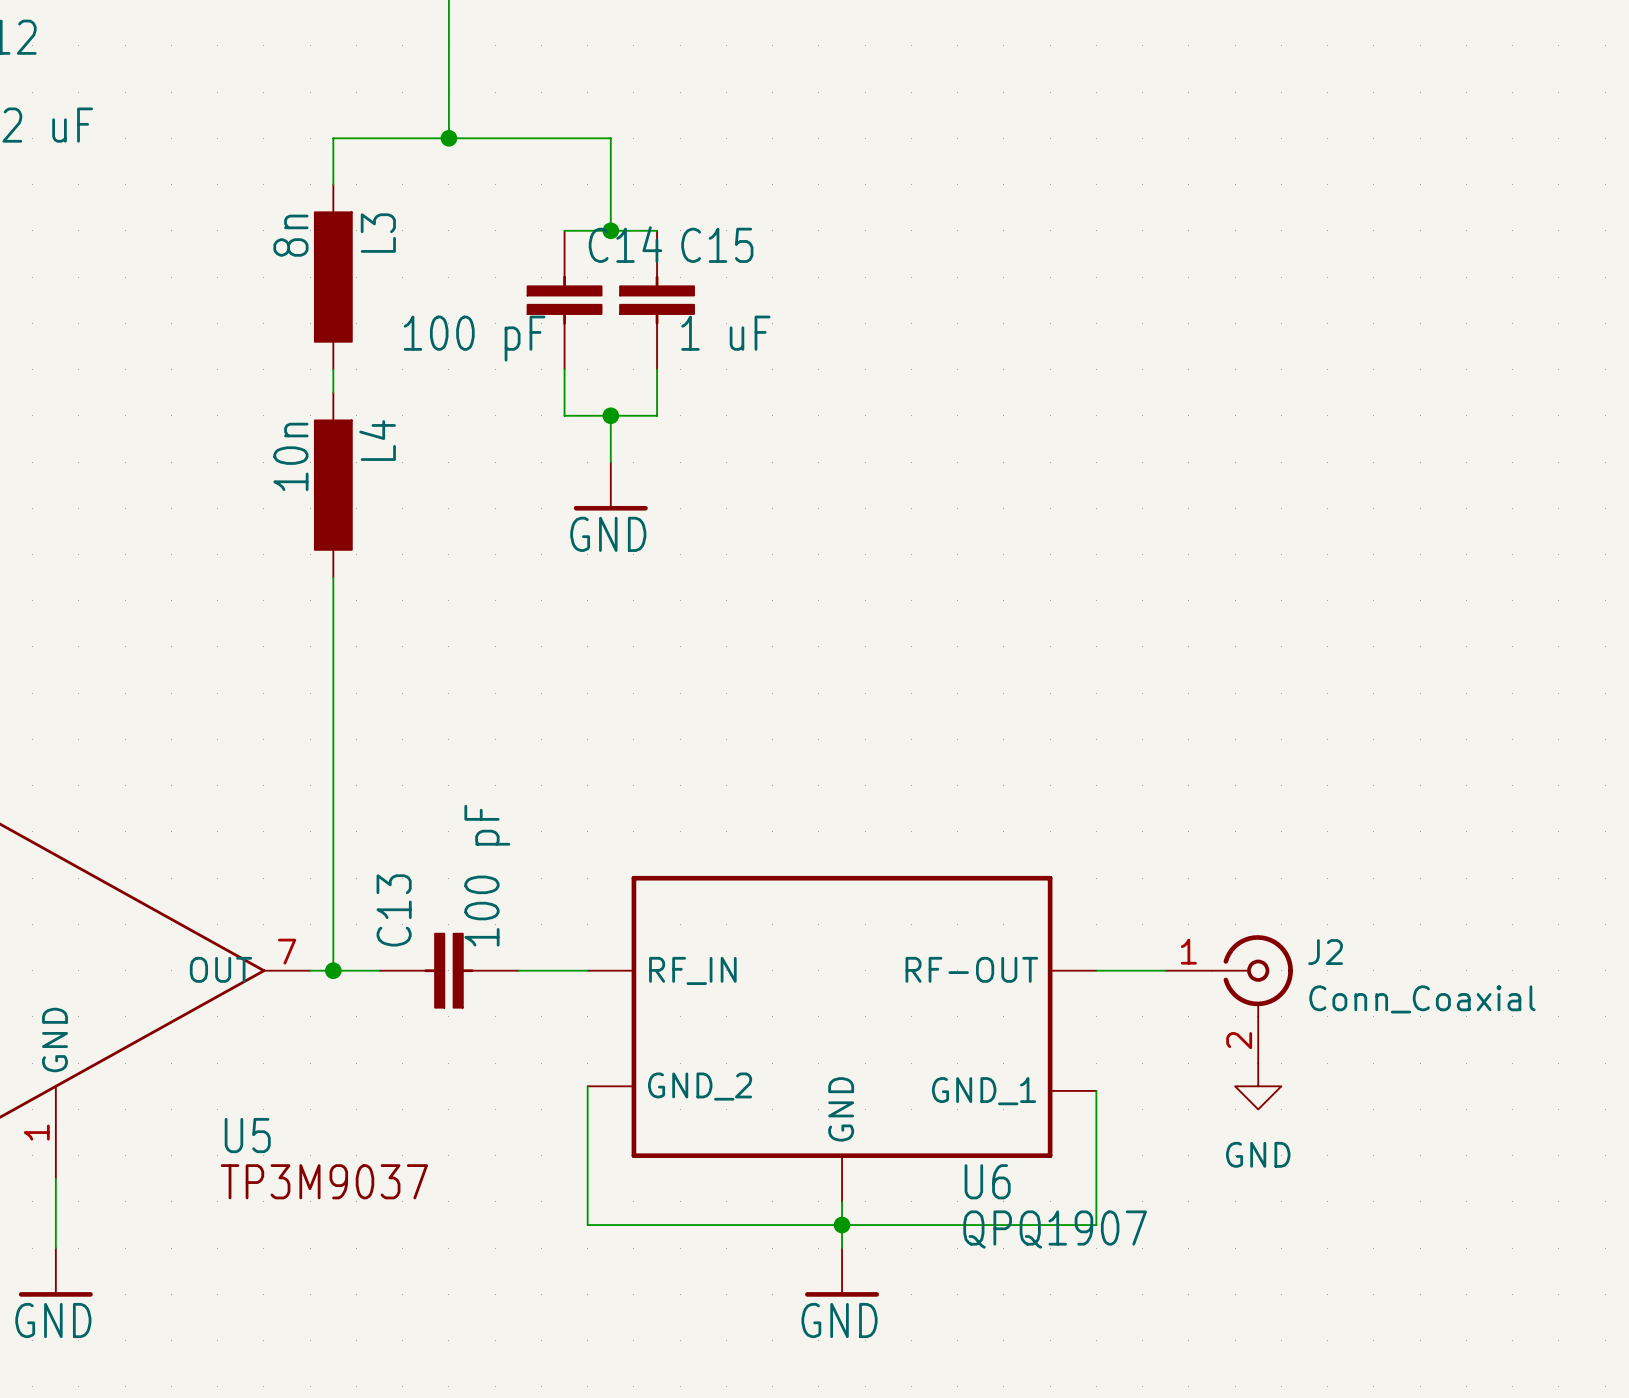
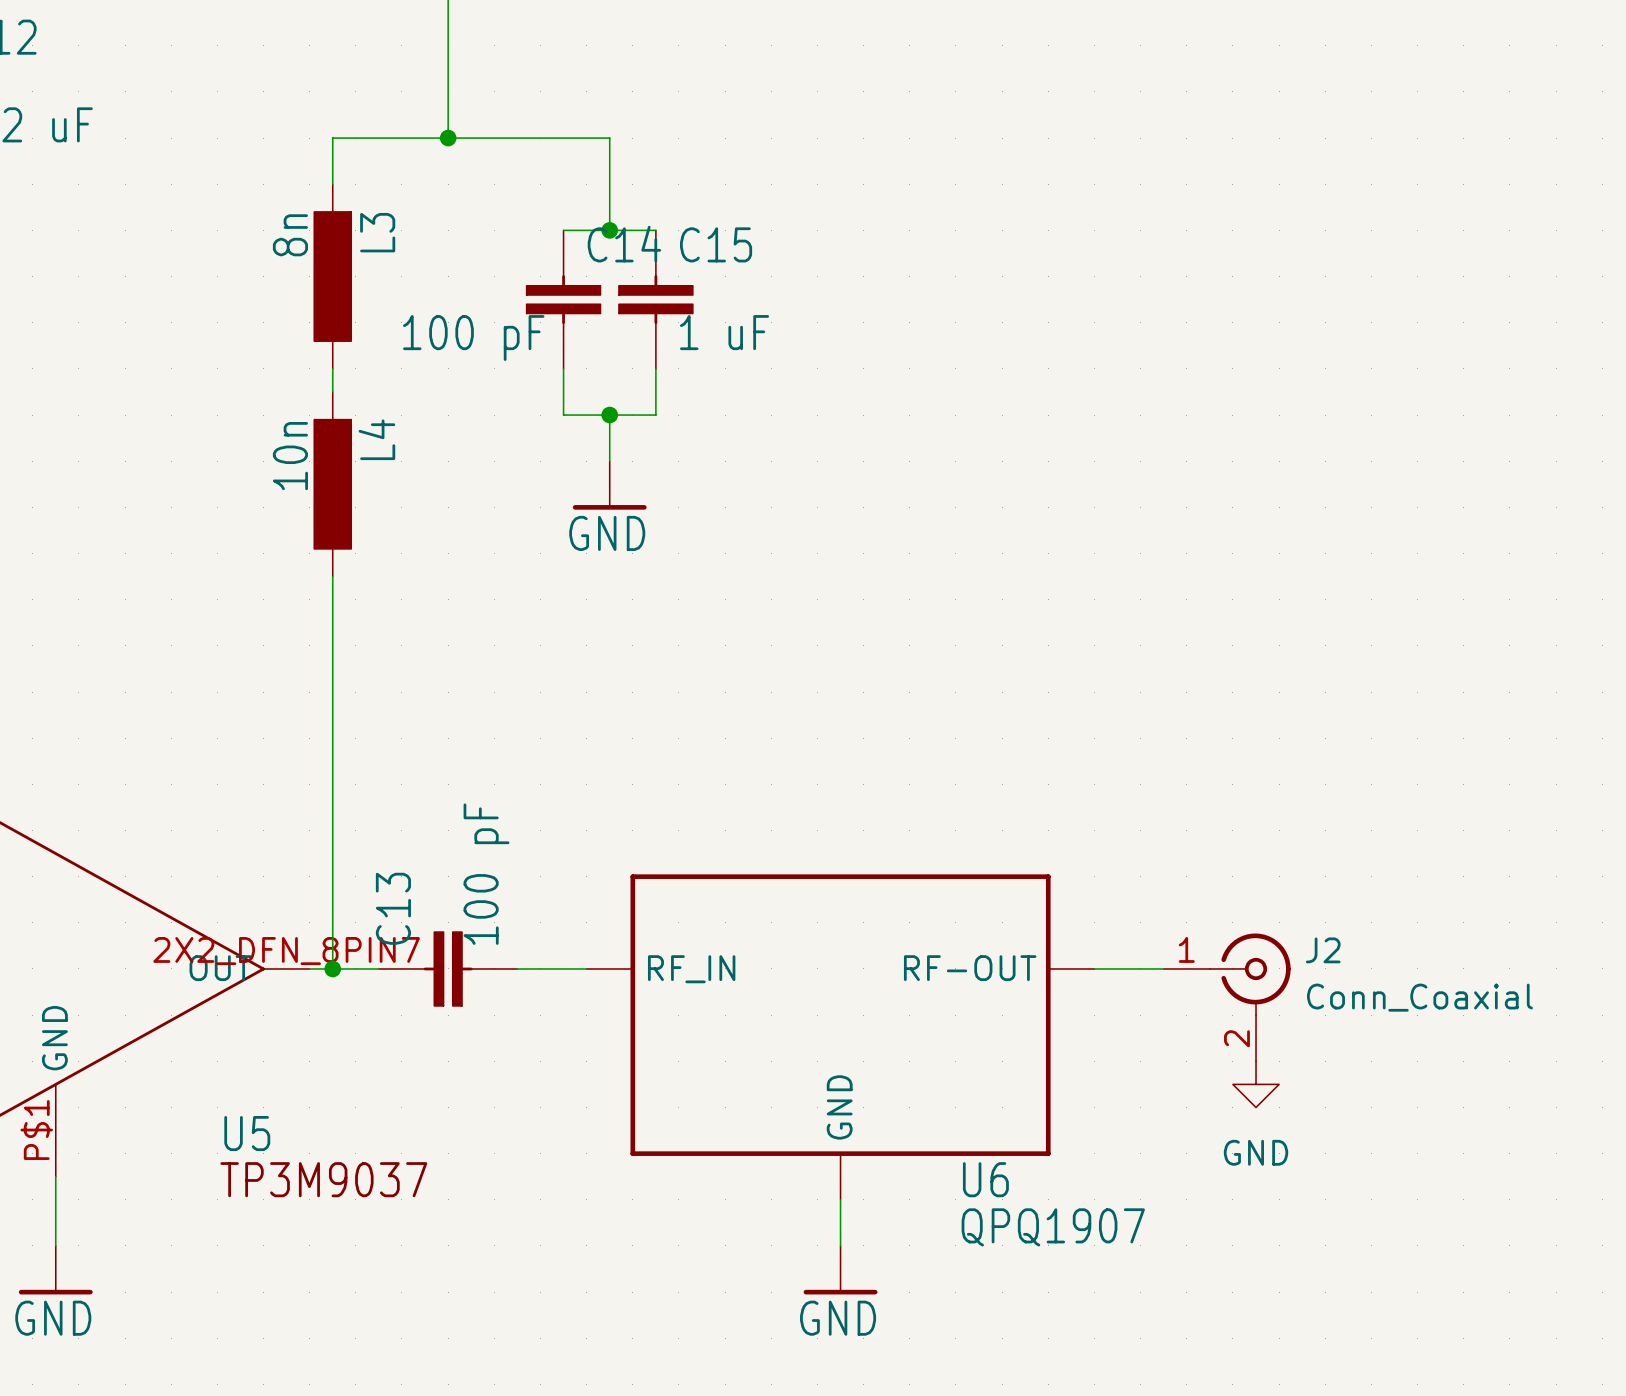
U6 symbol: [587, 875, 1097, 1202] -> [586, 874, 1095, 1200]
U5 pin number: 7 (287, 951) -> 2X2_DFN_8PIN7 (286, 951)
wire: (587, 1086) (587, 1225) (1096, 1225) (1096, 1090) -> none
U5 pin number: 1 (36, 1132) -> P$1 (36, 1130)
junction: (842, 1225) -> none

